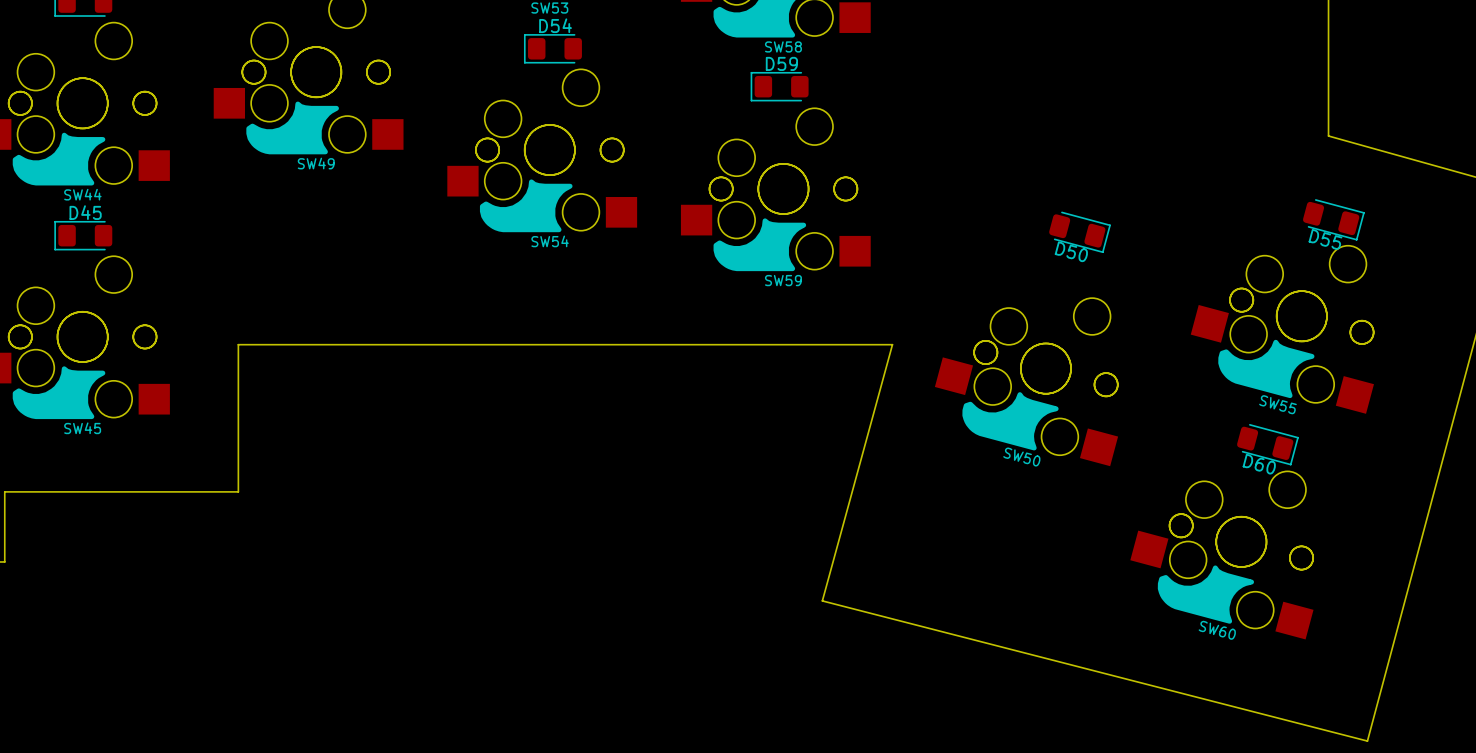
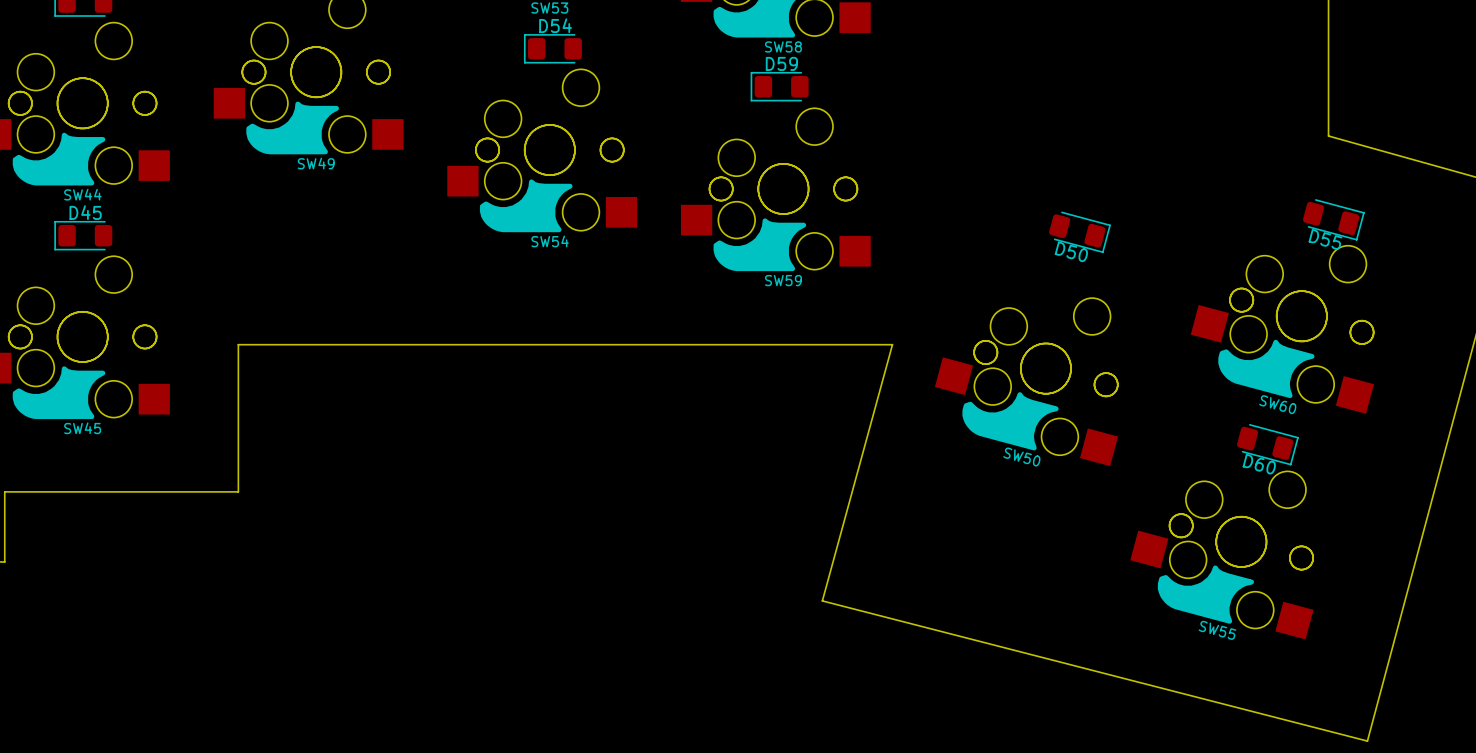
SW55 name: SW55 (1277, 404) -> SW60 (1277, 404)
SW60 name: SW60 (1217, 630) -> SW55 (1217, 630)

